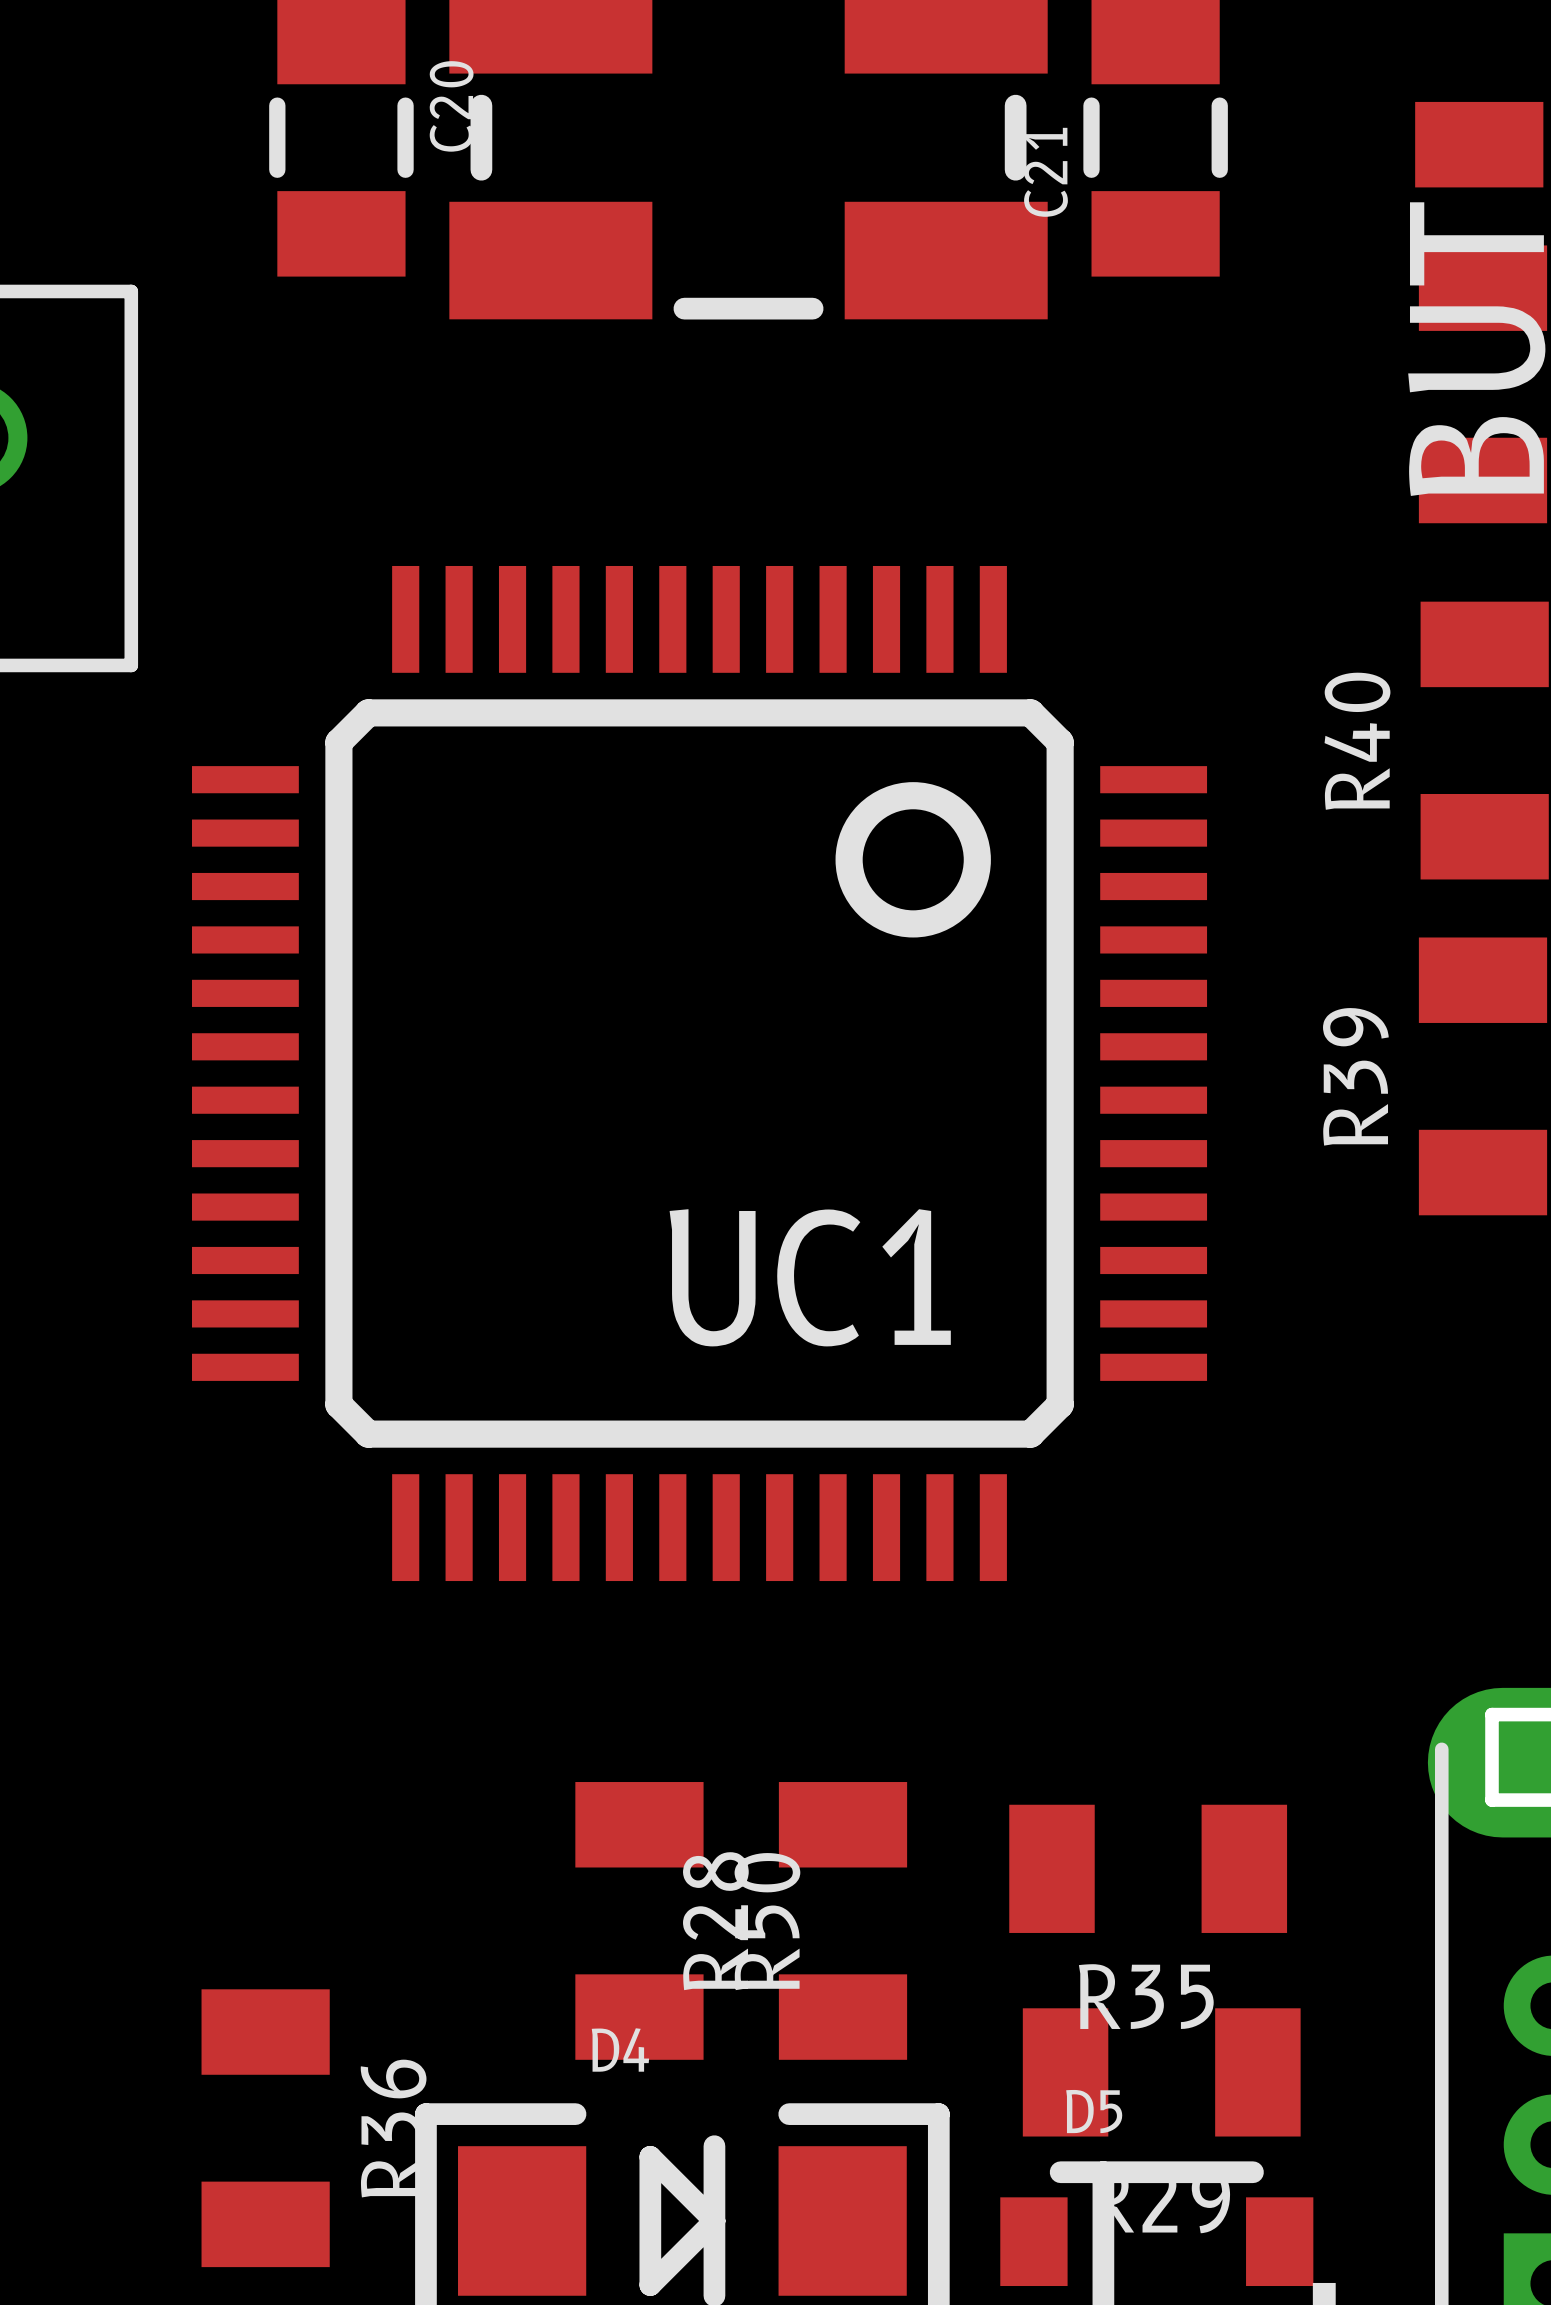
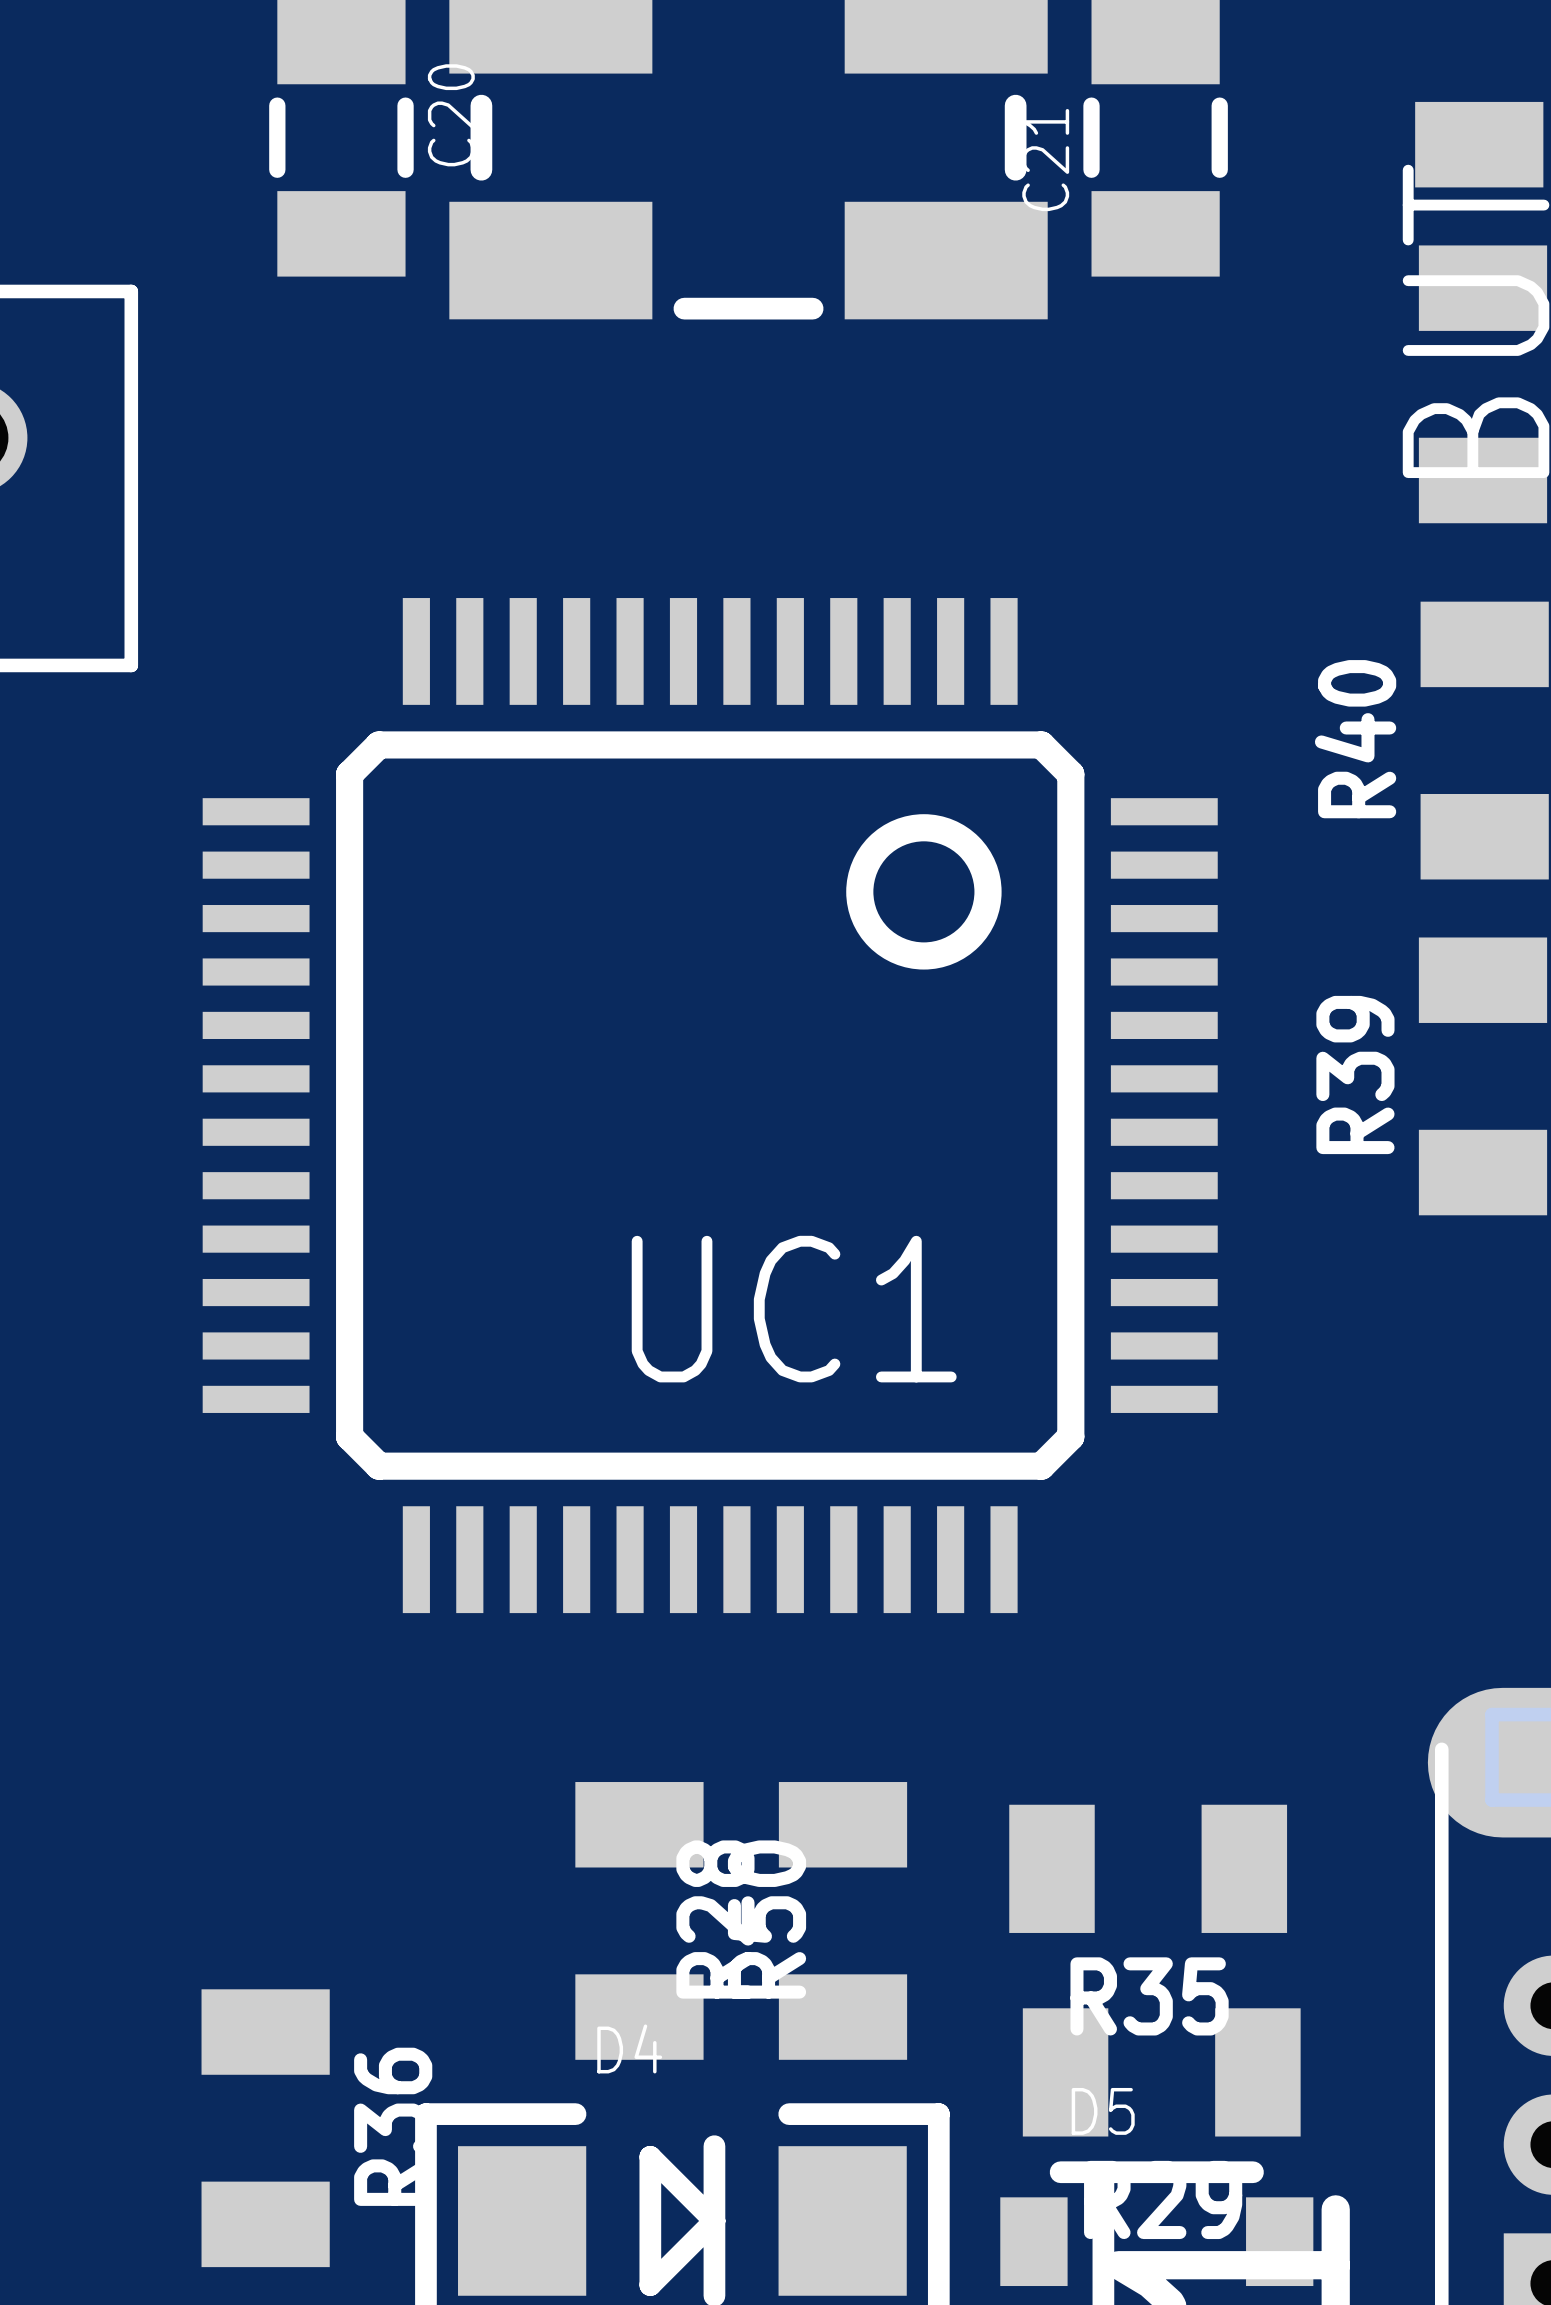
UC1 position: (699, 1073) -> (710, 1105)

